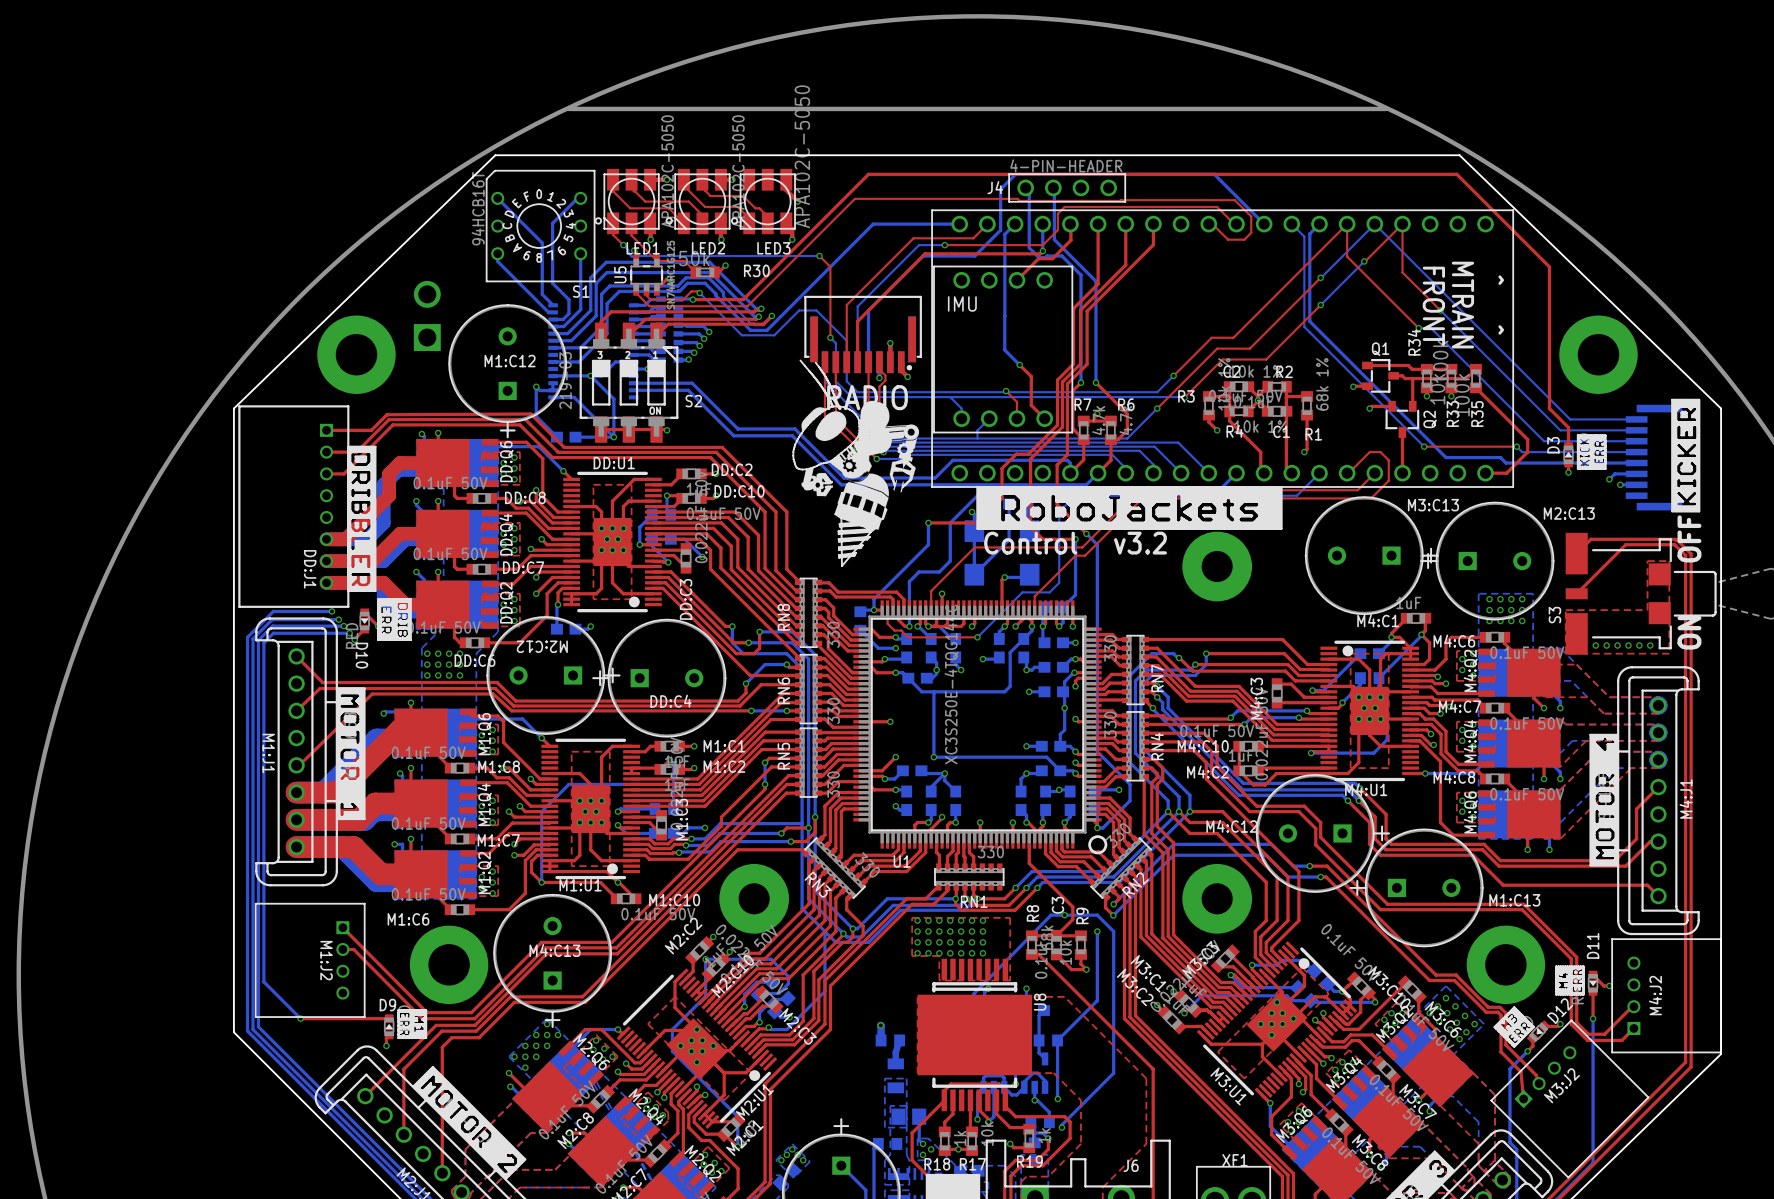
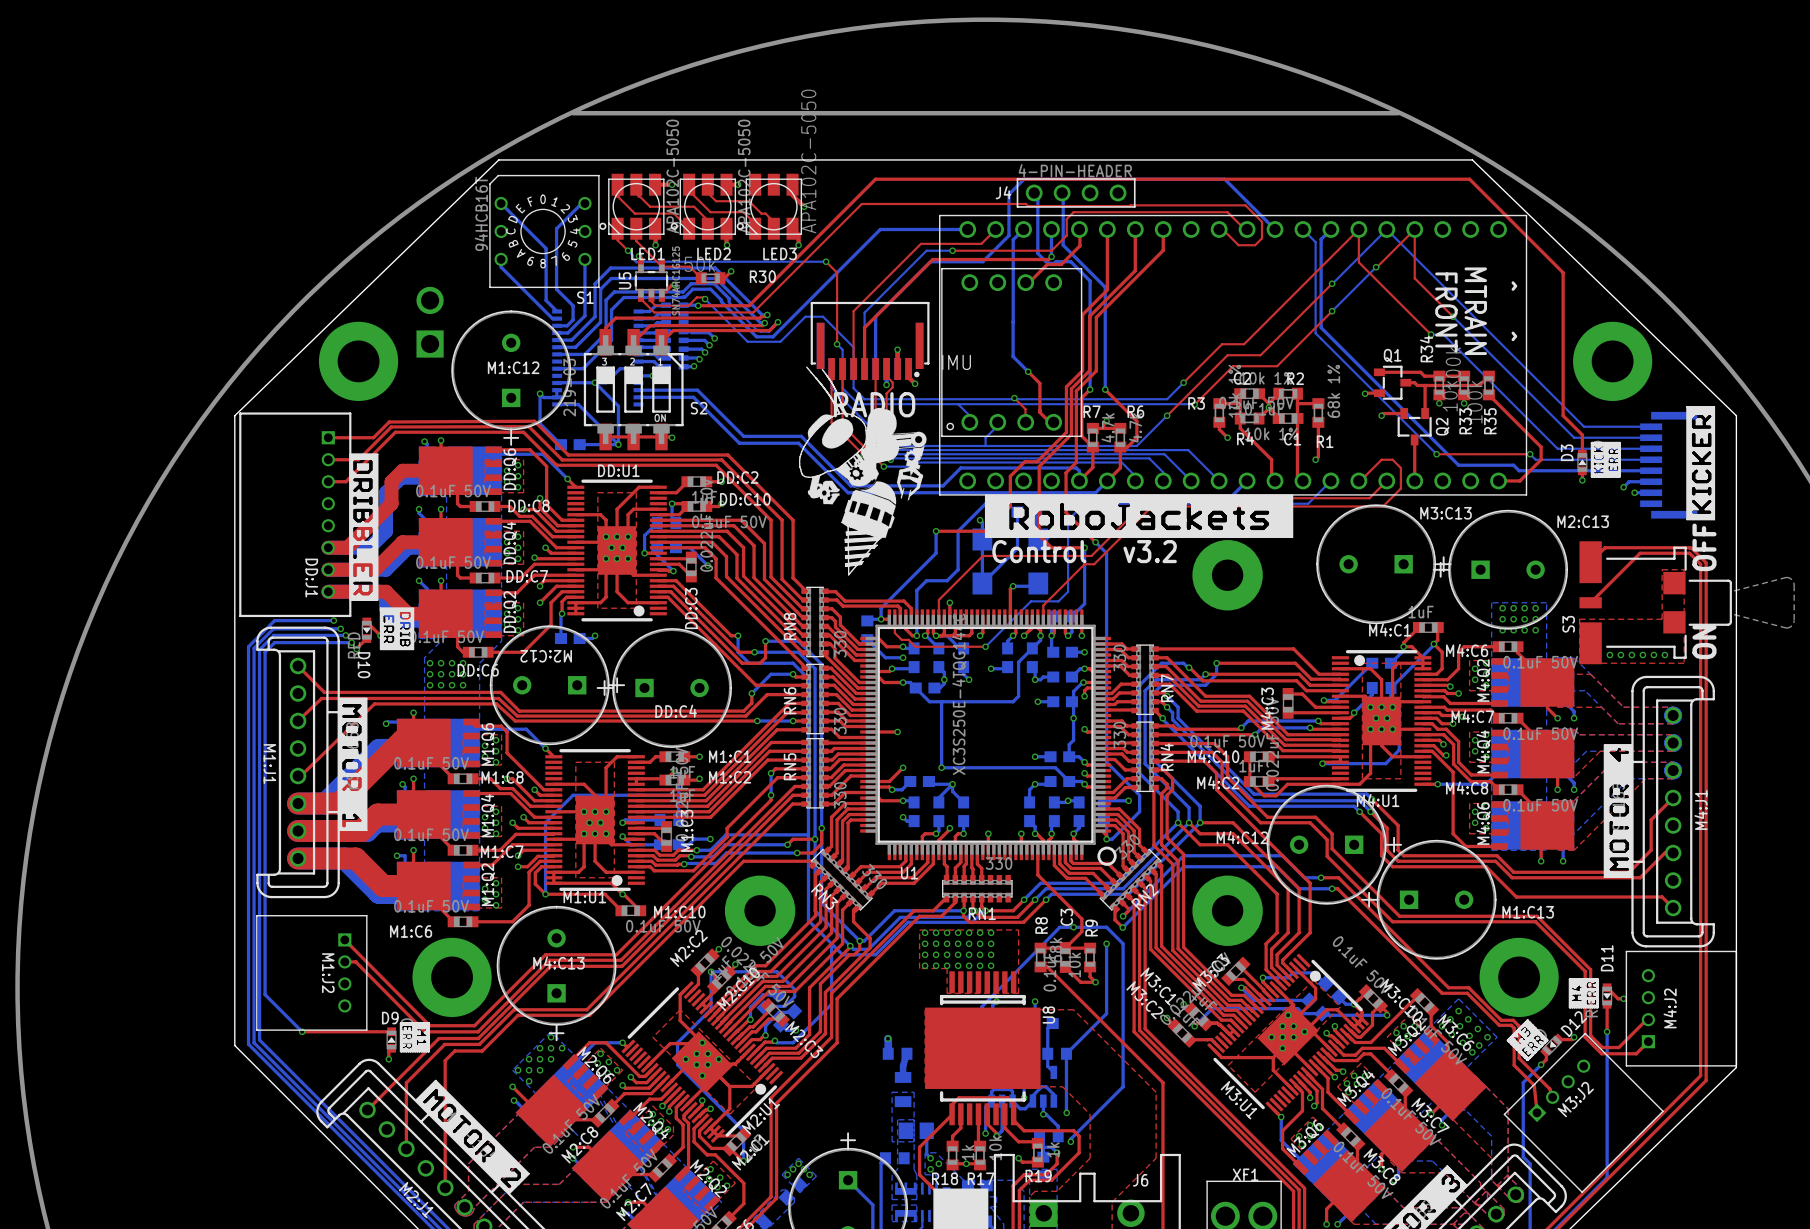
IMU footprint: [933, 265, 1074, 434] -> [941, 267, 1083, 438]
IMU name position: IMU (962, 303) -> IMU (956, 362)

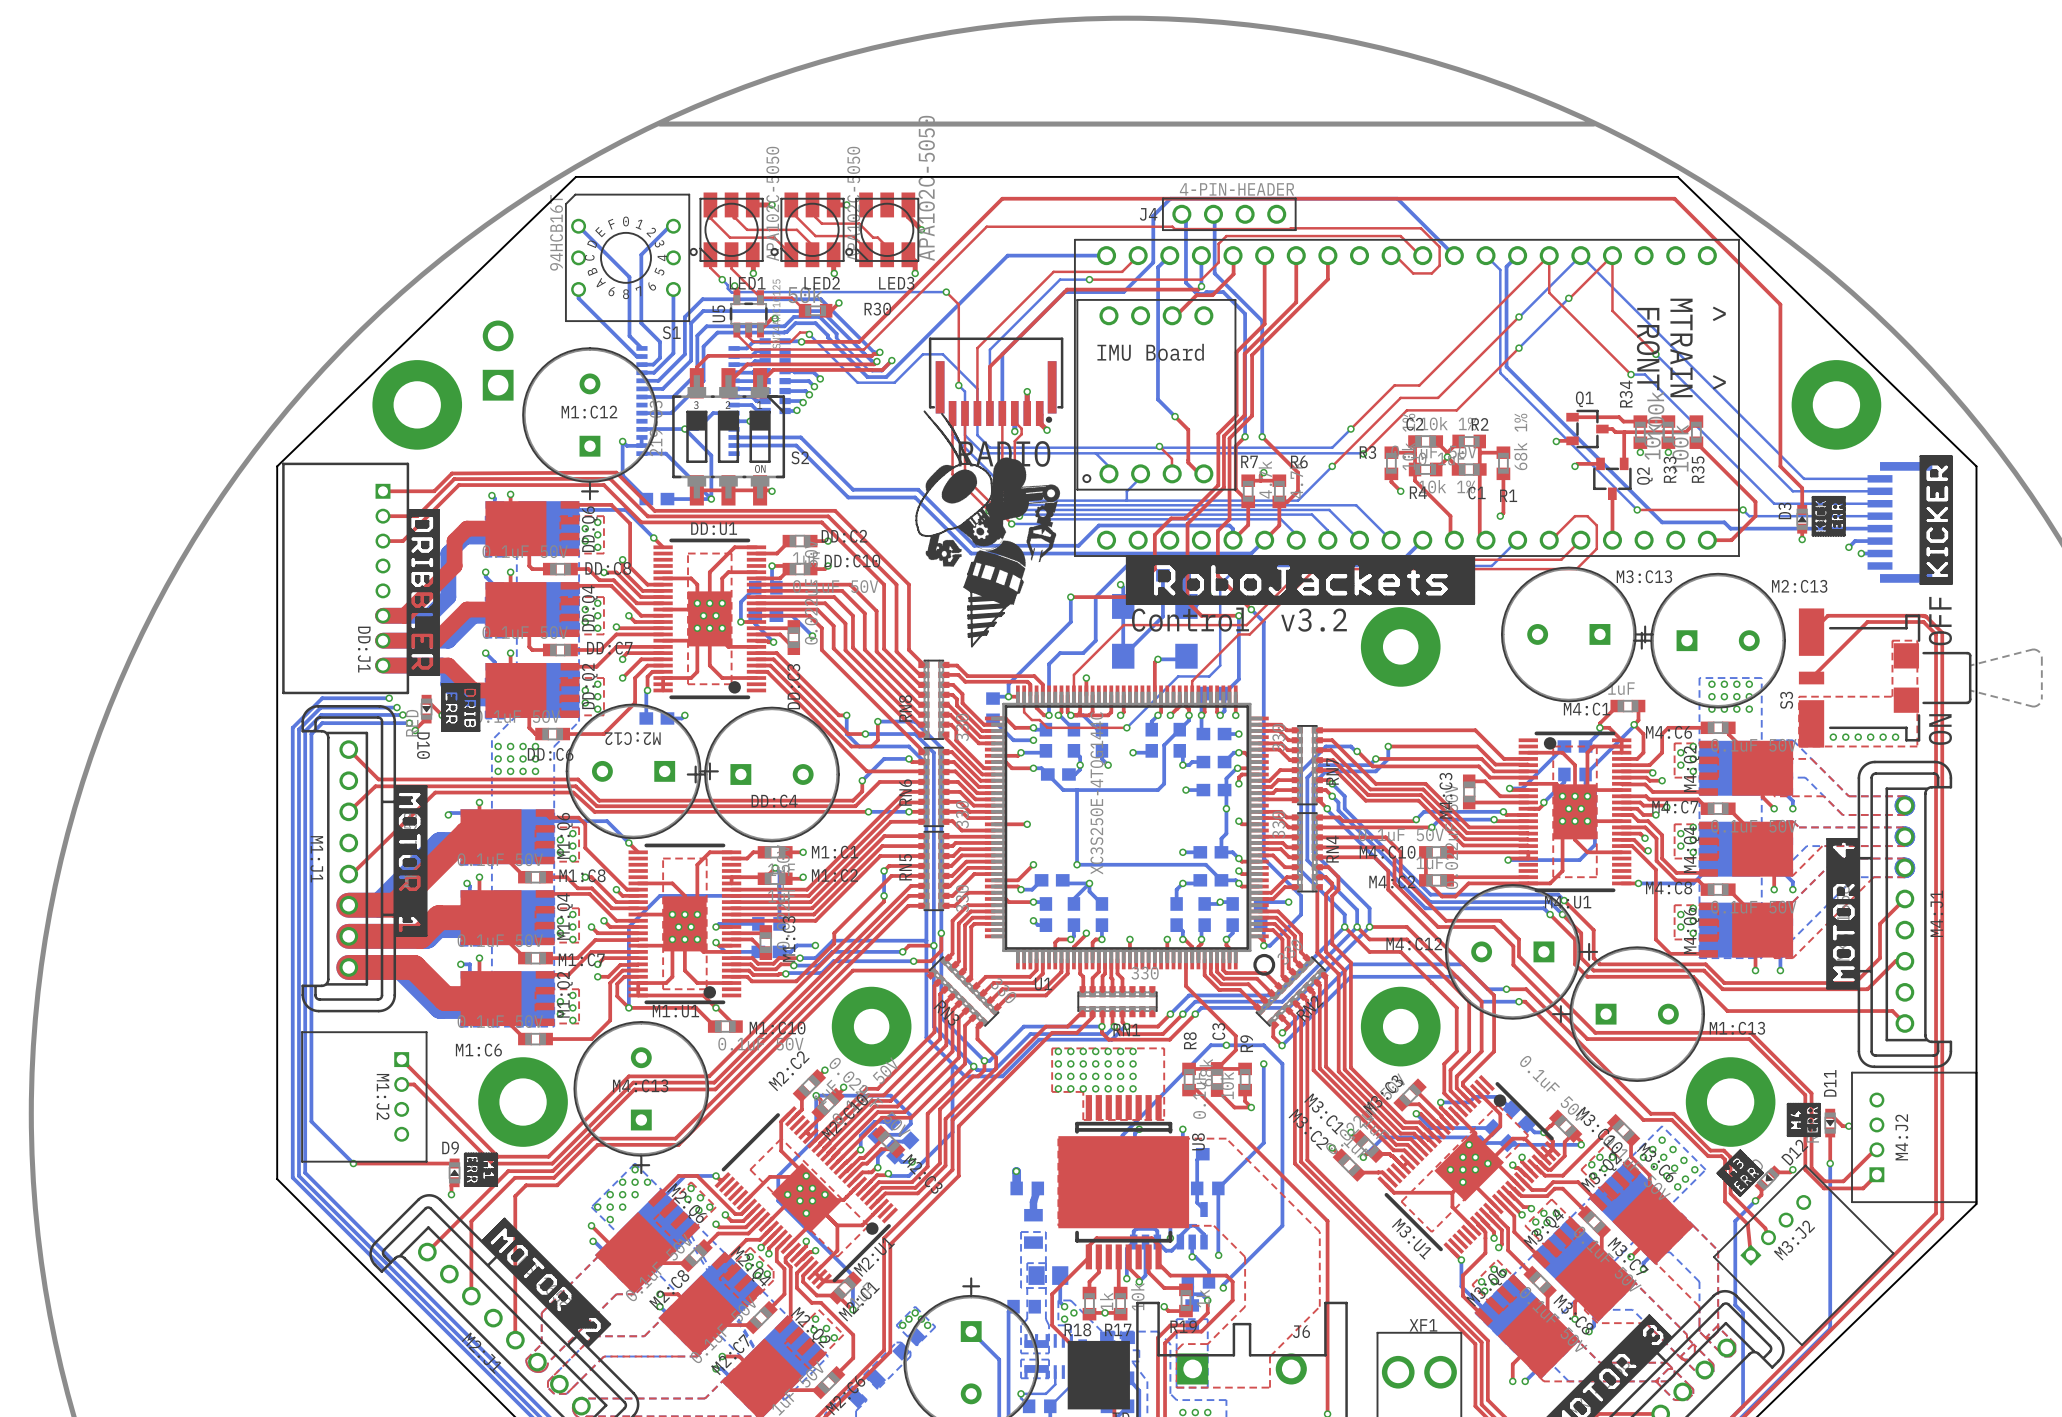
text: none -> IMU Board (1150, 352)
IMU name: IMU (956, 362) -> none

